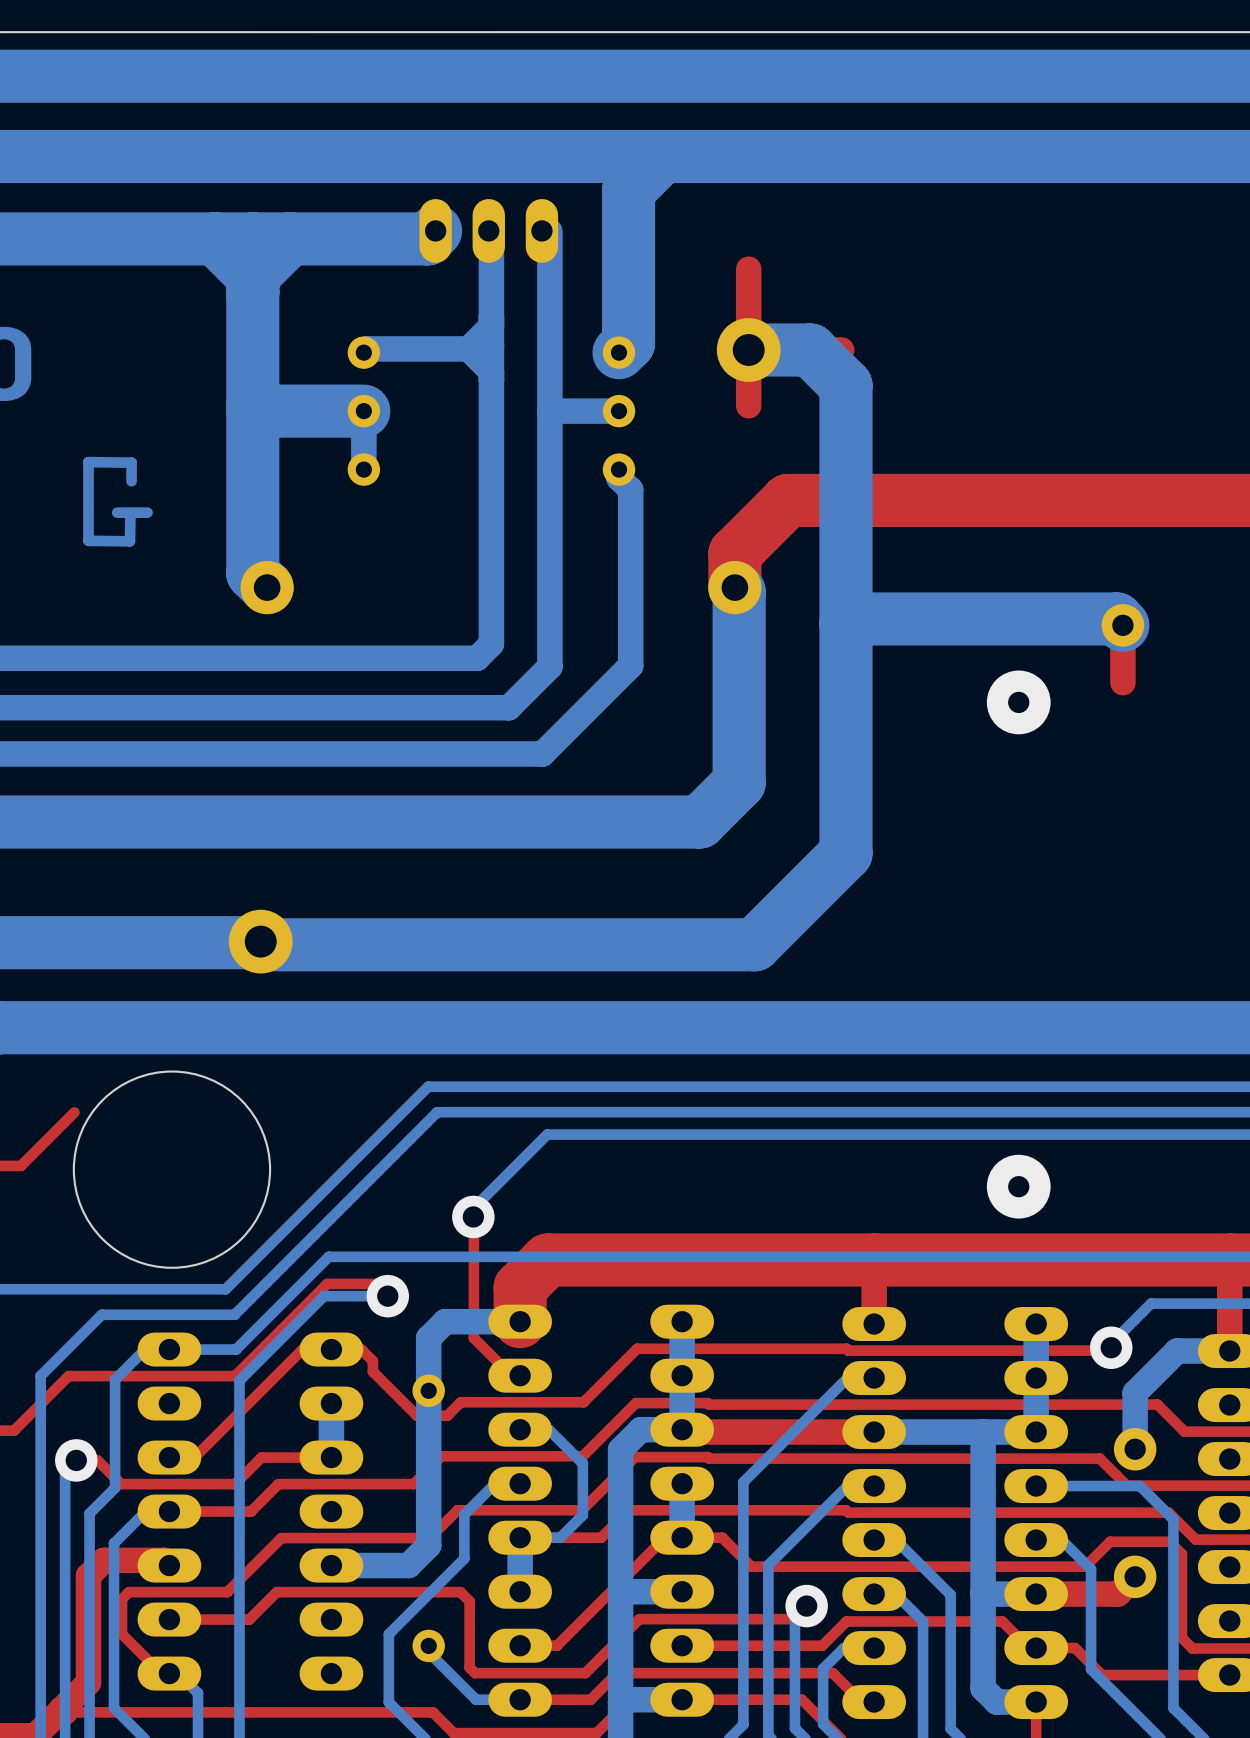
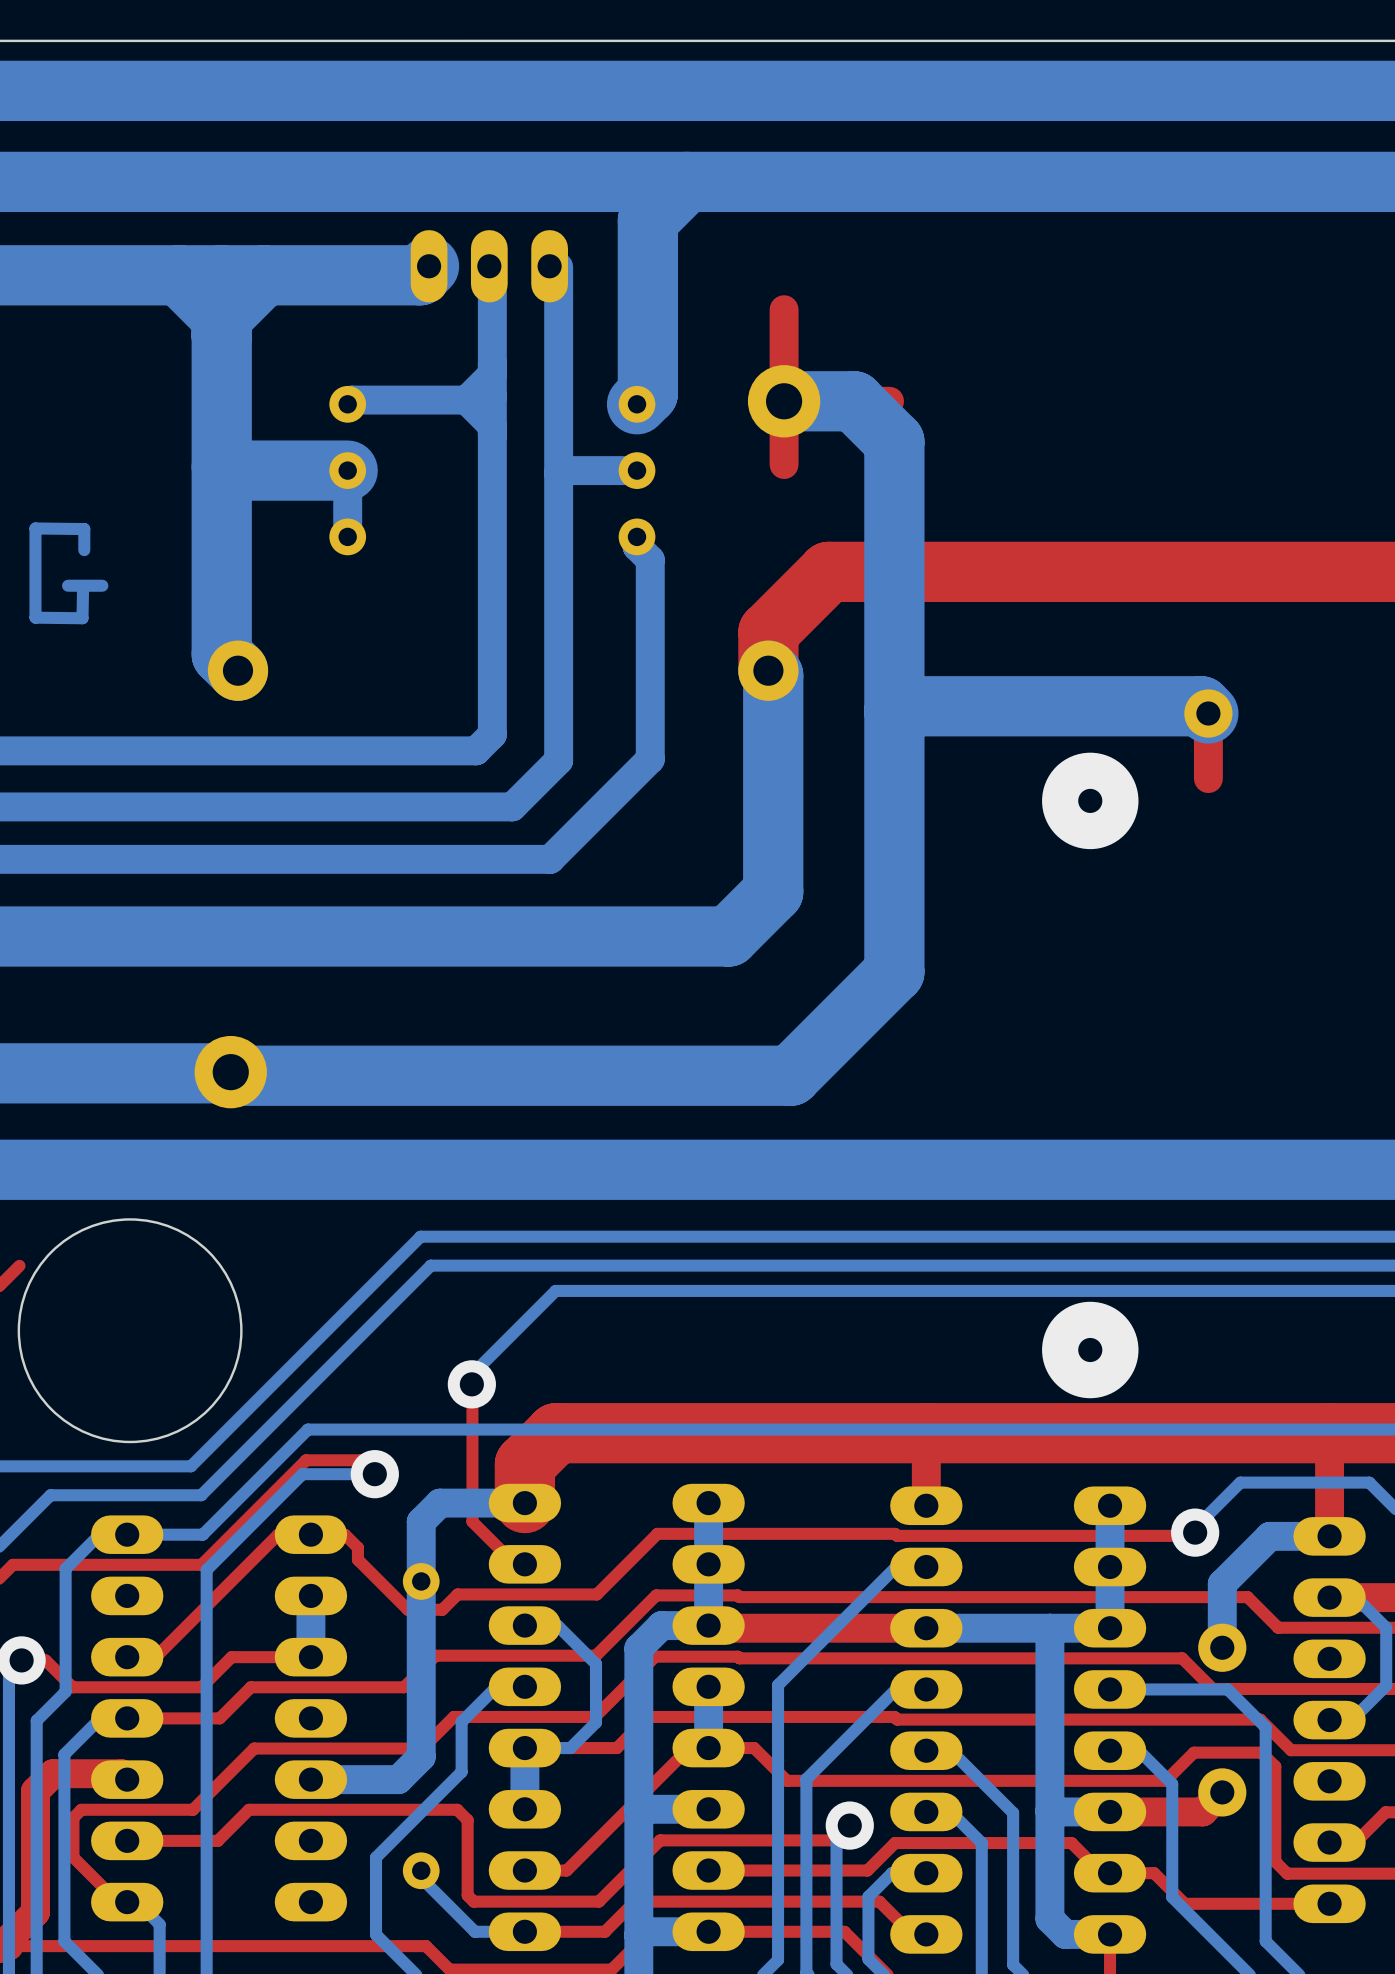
via size: [986, 670, 1051, 735] -> [1042, 752, 1139, 850]
via size: [986, 1154, 1051, 1219] -> [1042, 1301, 1139, 1399]

